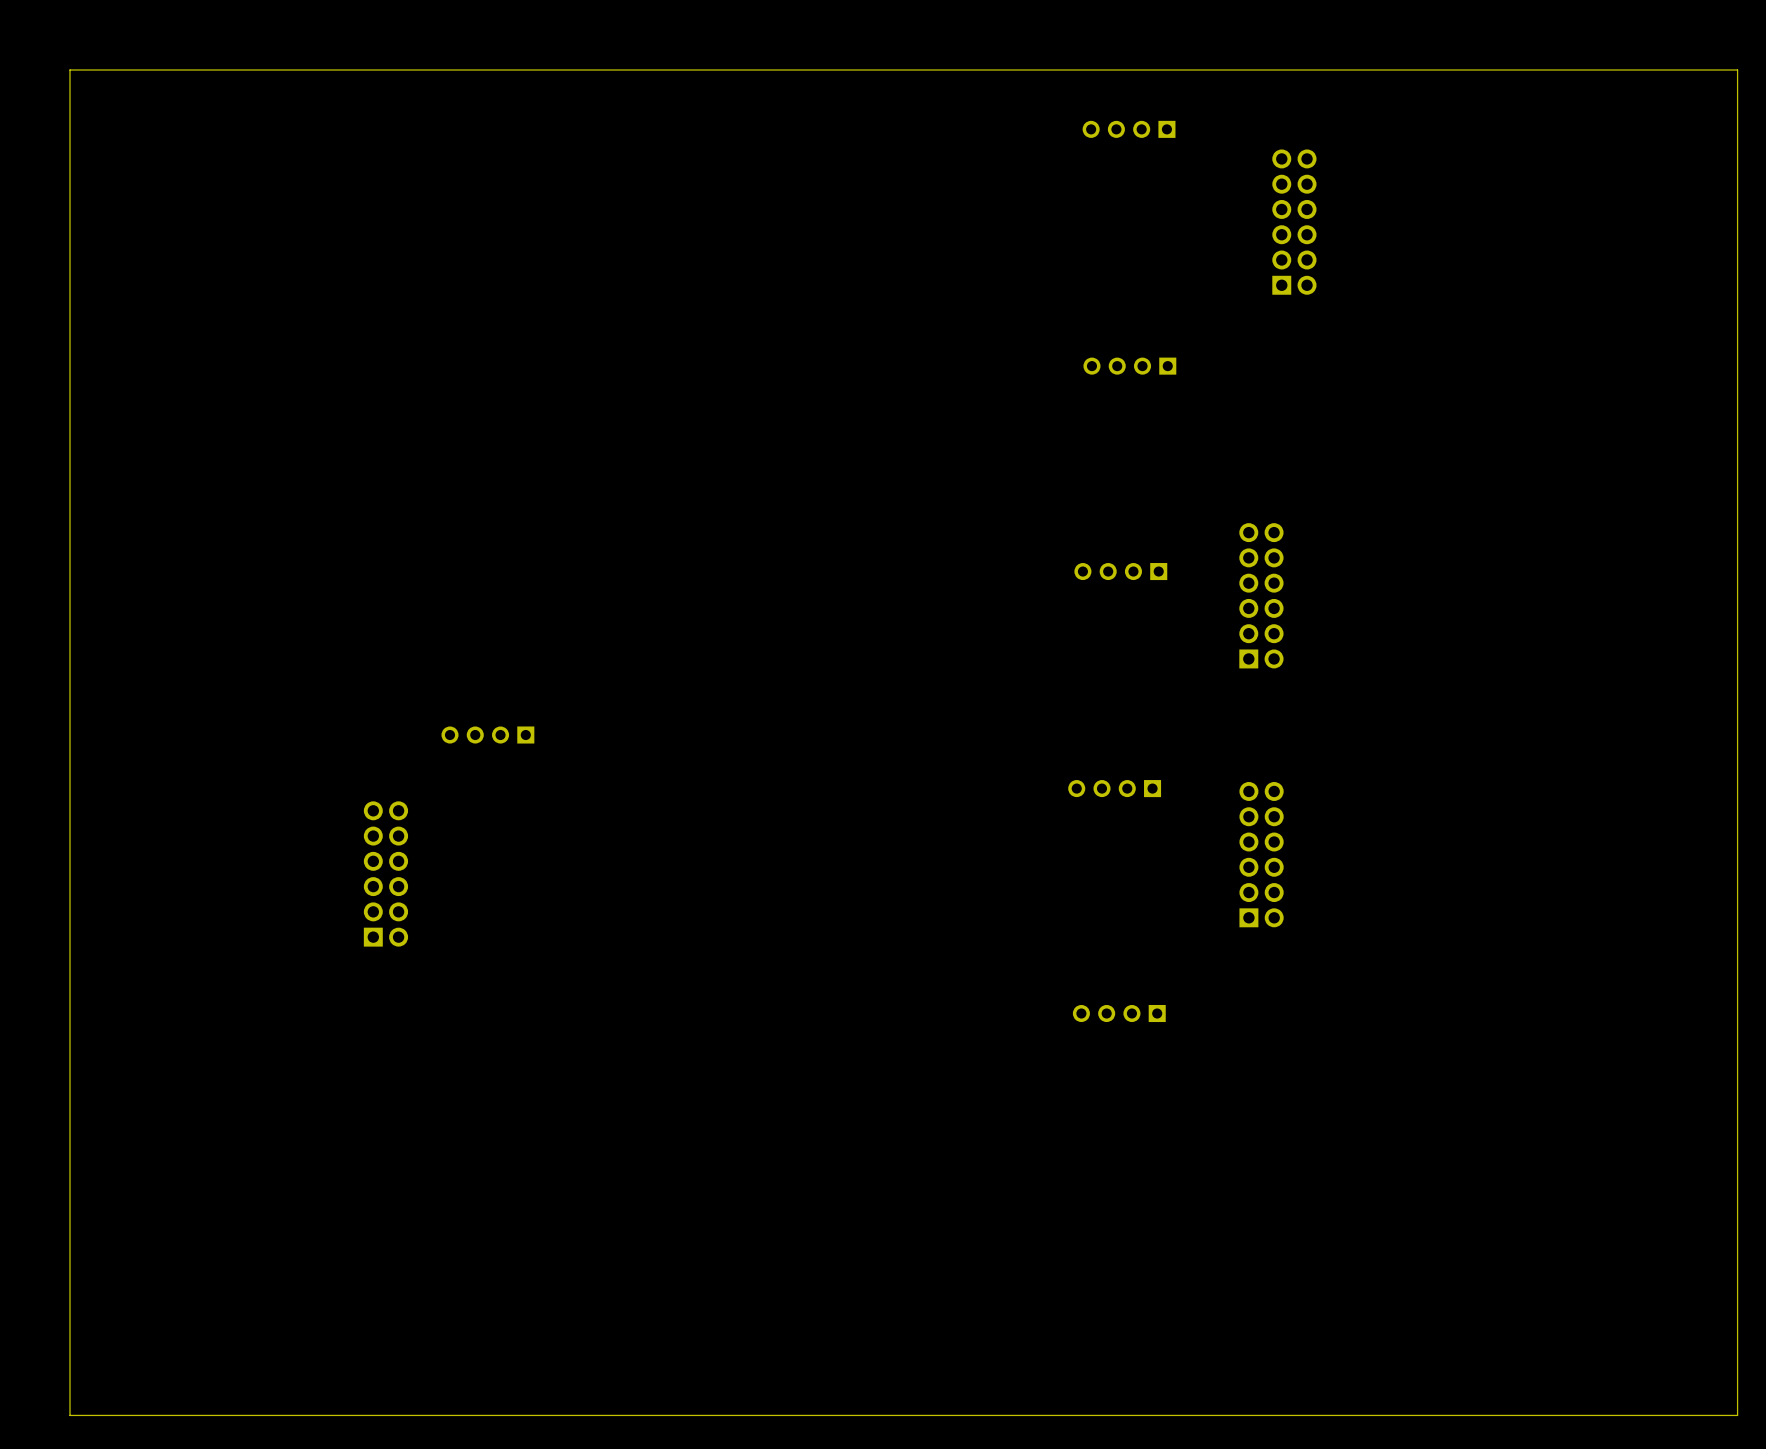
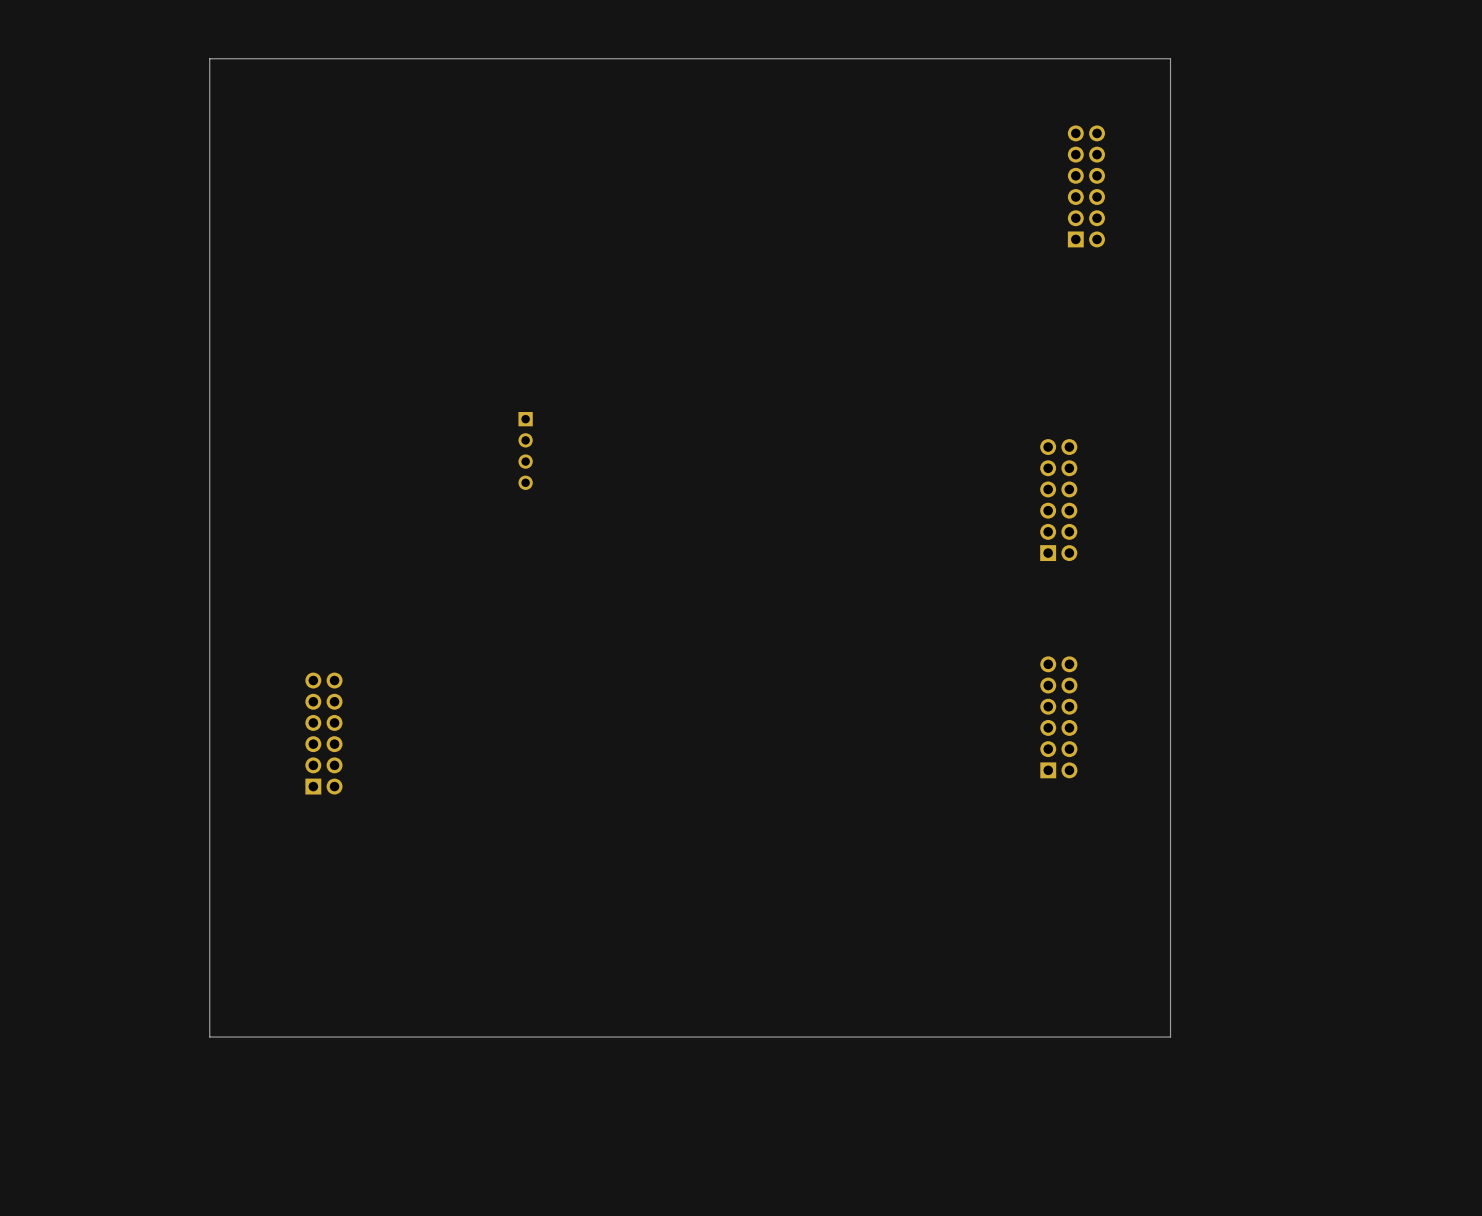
board edge: (1394, 70) (1737, 70) (1737, 1415) (70, 1415) (70, 70) (249, 70) -> (1170, 58) (1170, 1037) (209, 1037) (209, 58)
part: (1129, 129) -> none
part: (1129, 366) -> none
part: (1120, 571) -> none
part rotation: 0° (487, 735) -> 90° counterclockwise (525, 450)
part position: (487, 735) -> (525, 450)
part: (1114, 788) -> none
part: (1119, 1013) -> none

